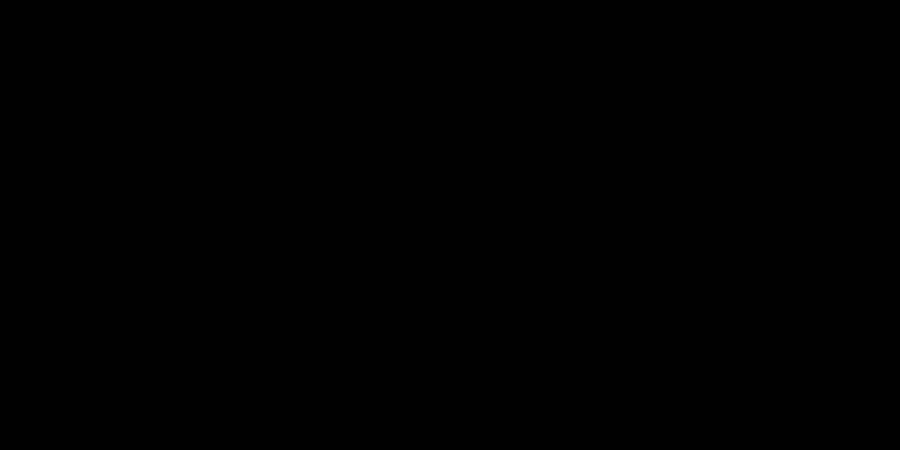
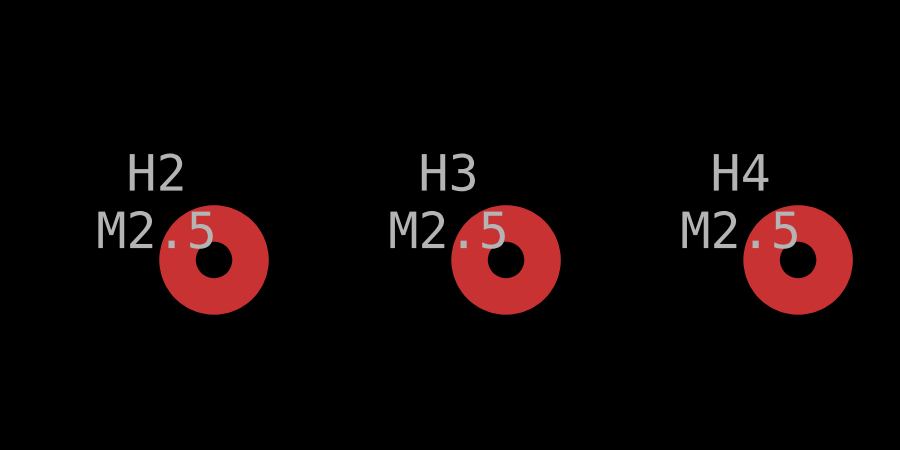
H2: none -> M2.5 (214, 259)
H3: none -> M2.5 (506, 259)
H4: none -> M2.5 (798, 259)

